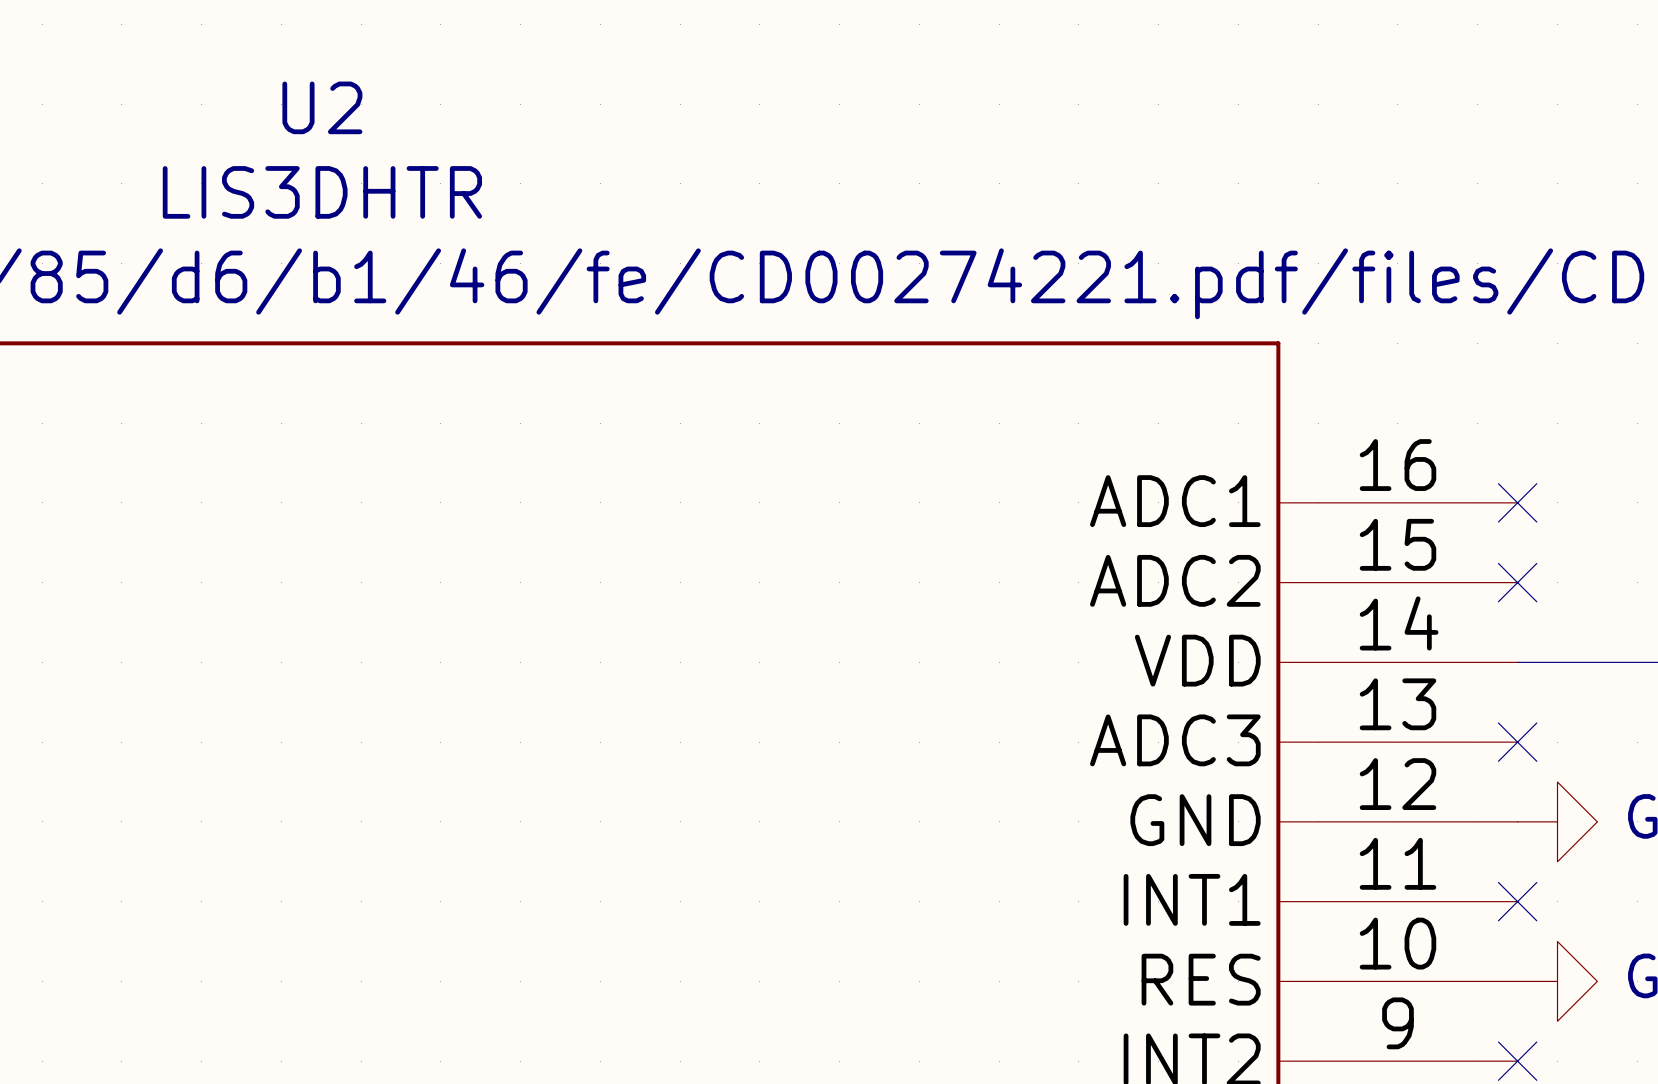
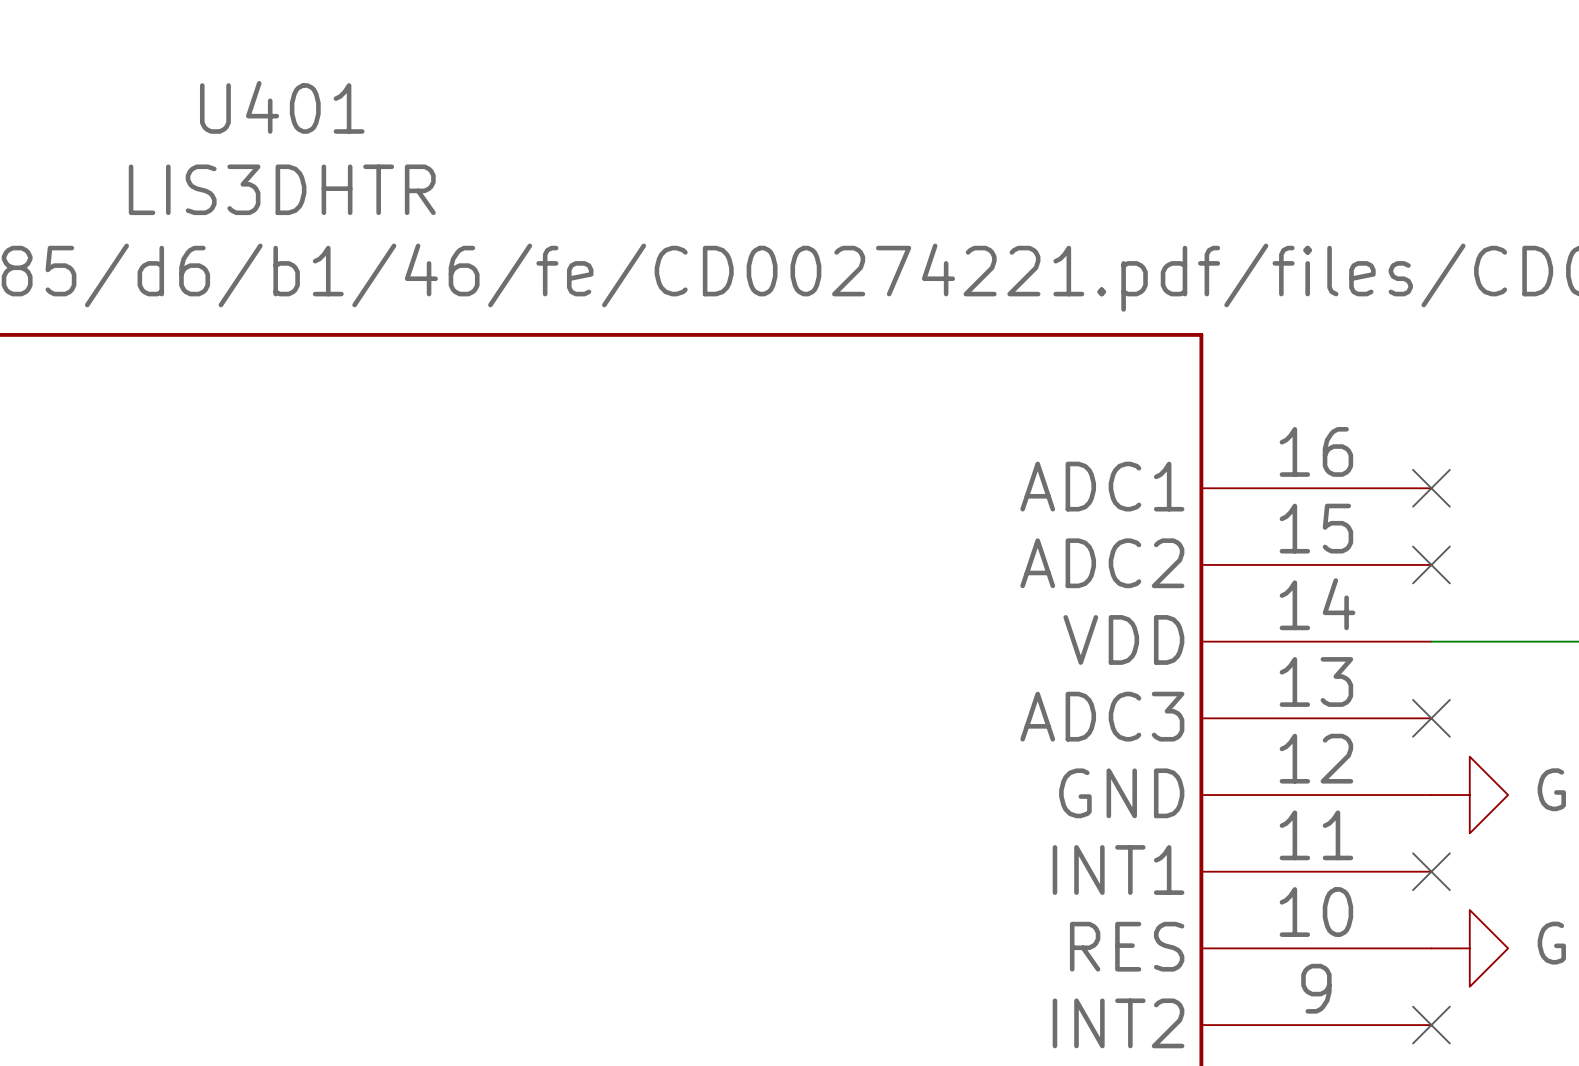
U2 name: U2 (322, 107) -> U401 (282, 107)

